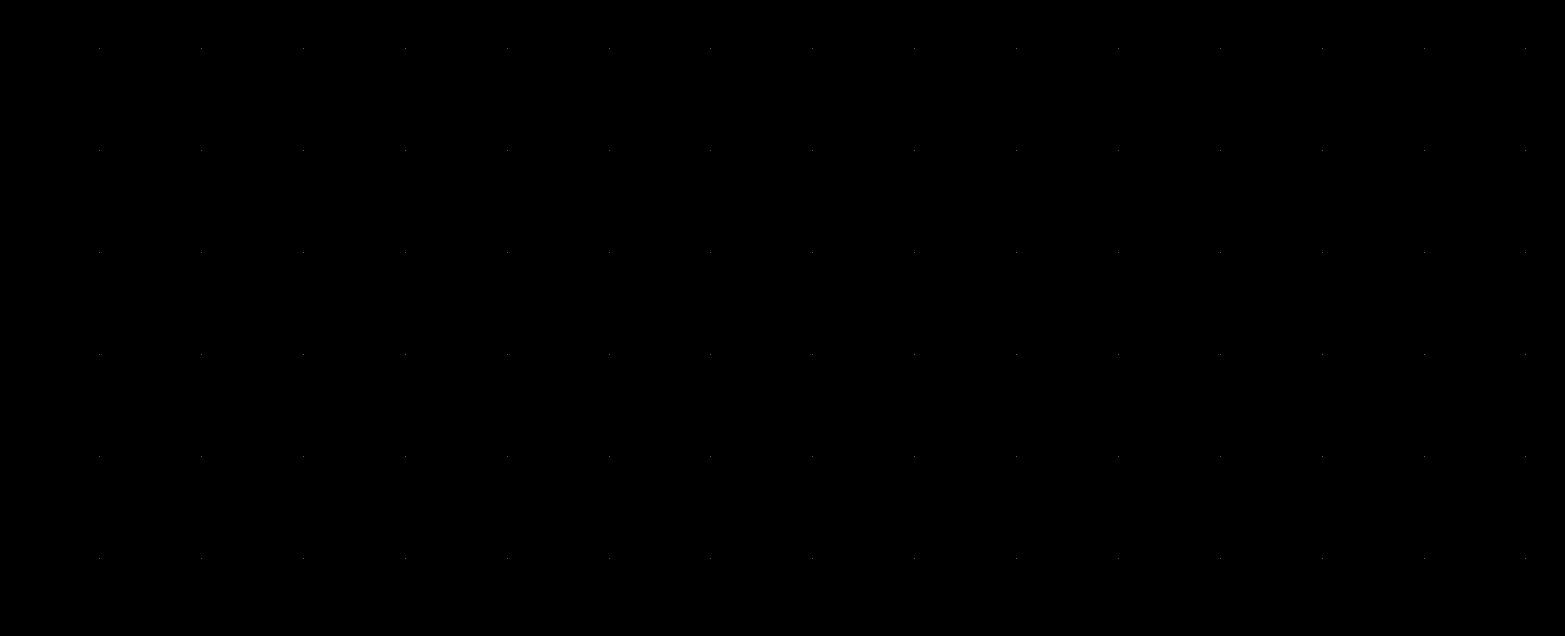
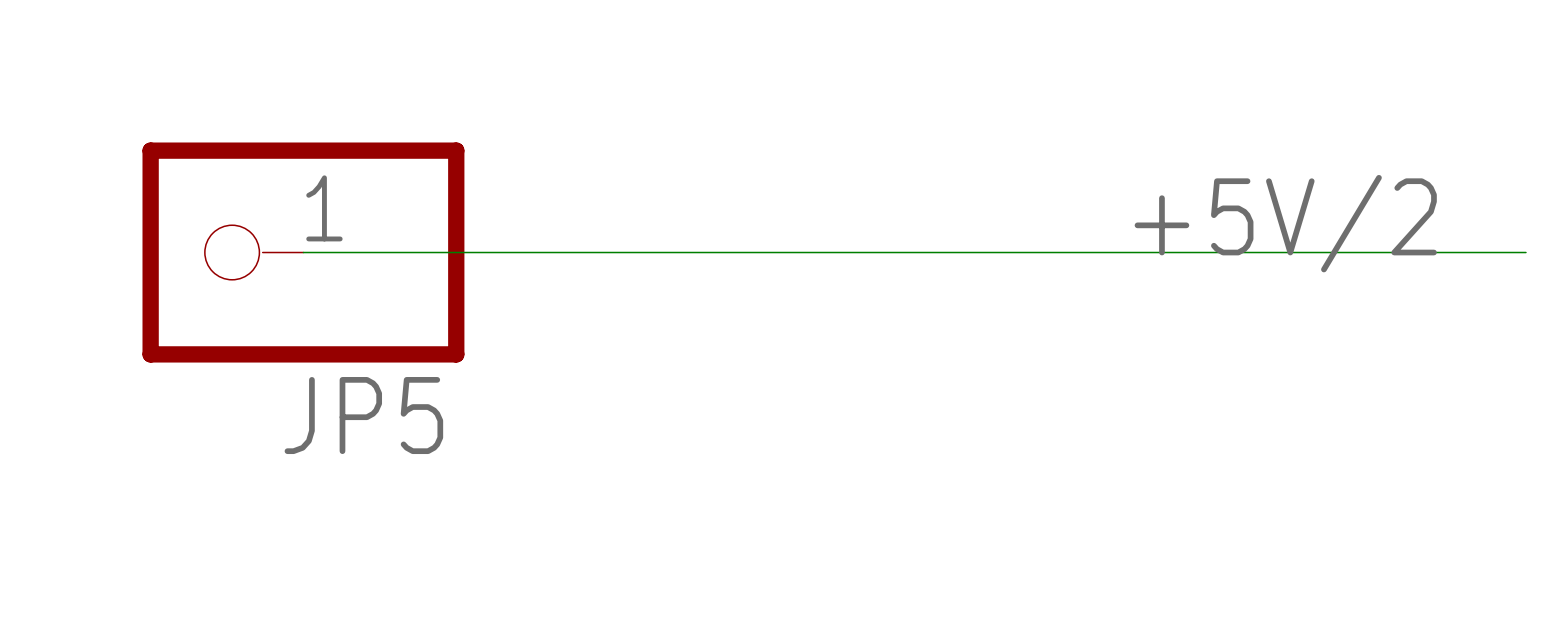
label: none -> +5V/2 (1285, 223)
wire: none -> (303, 252) (1525, 252)
JP5: none -> (303, 252)

